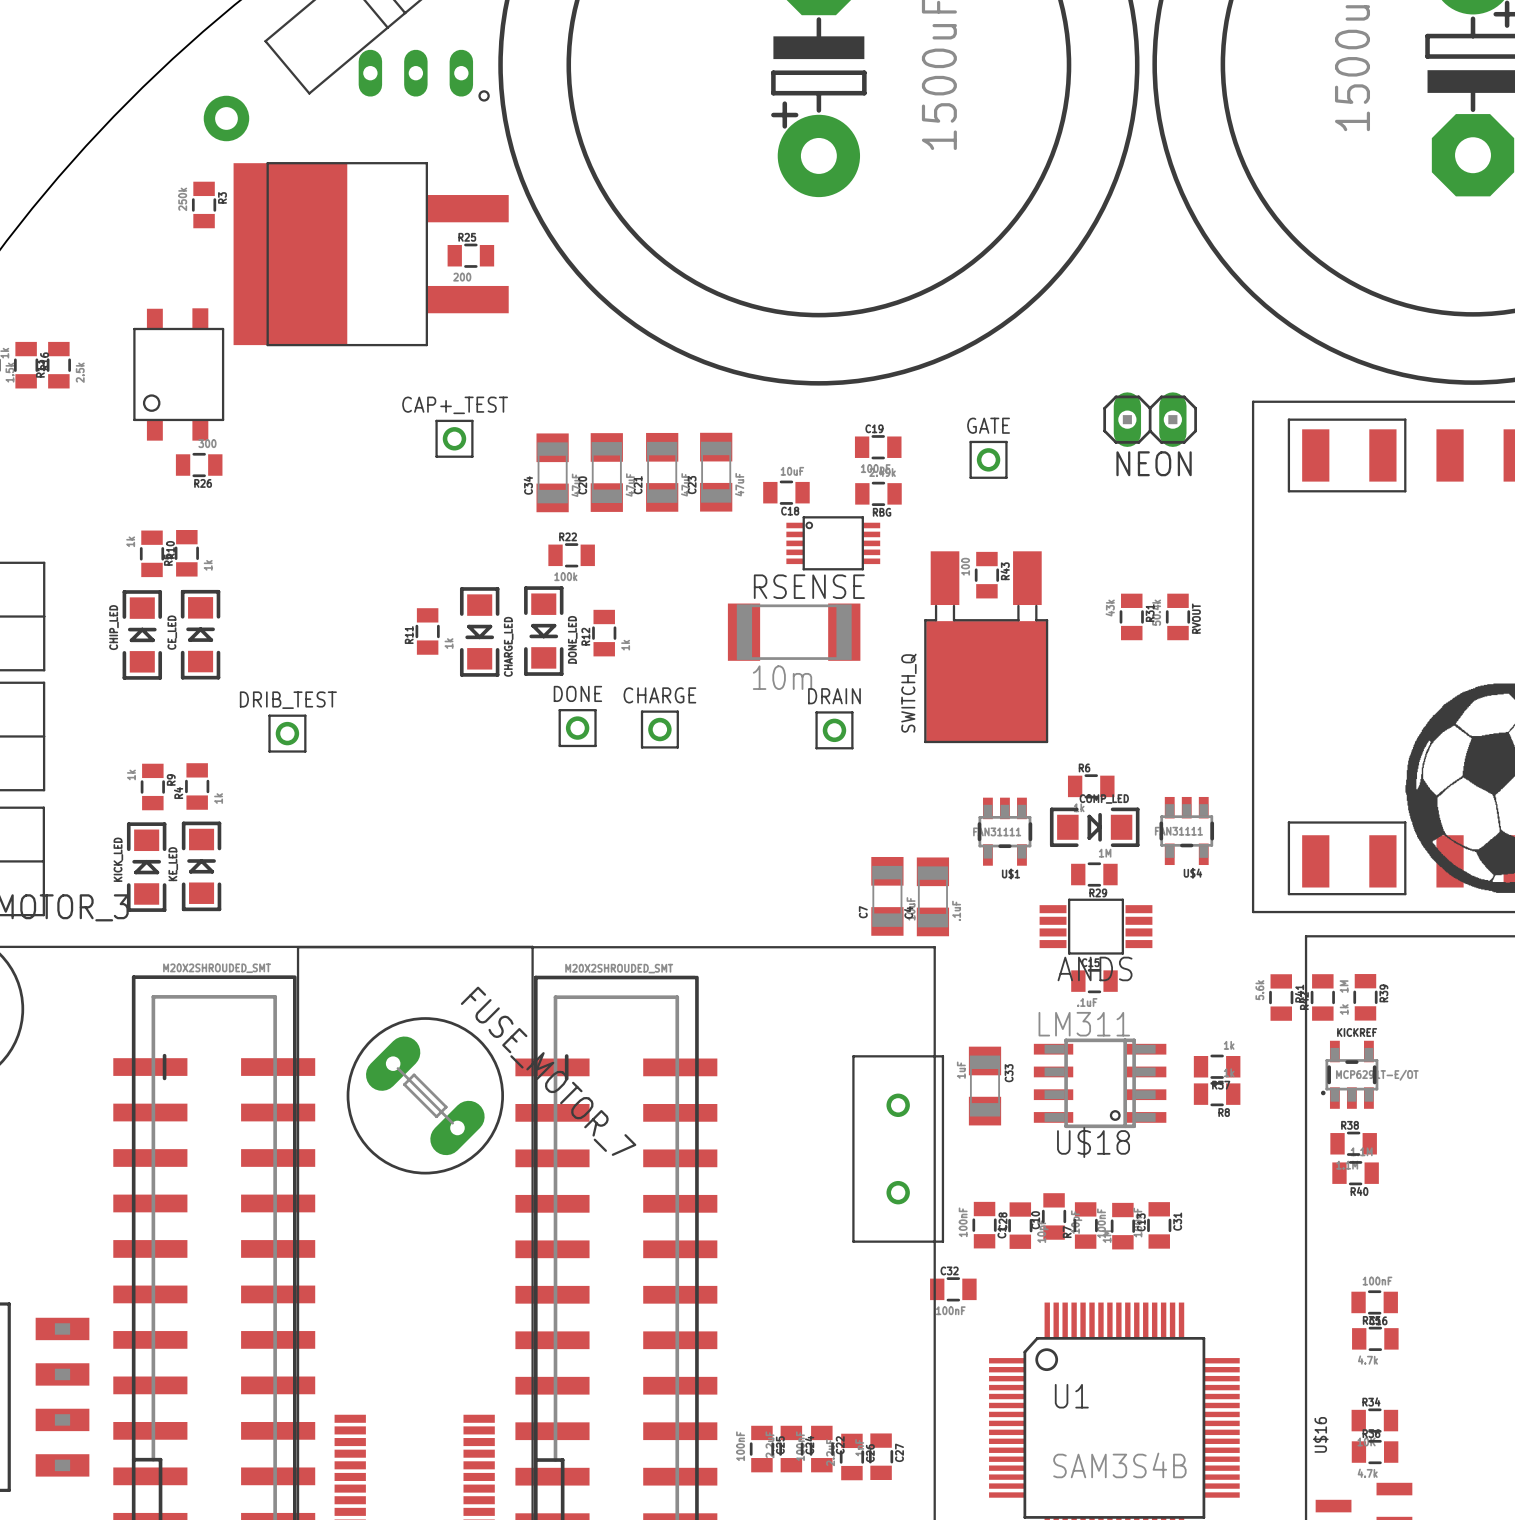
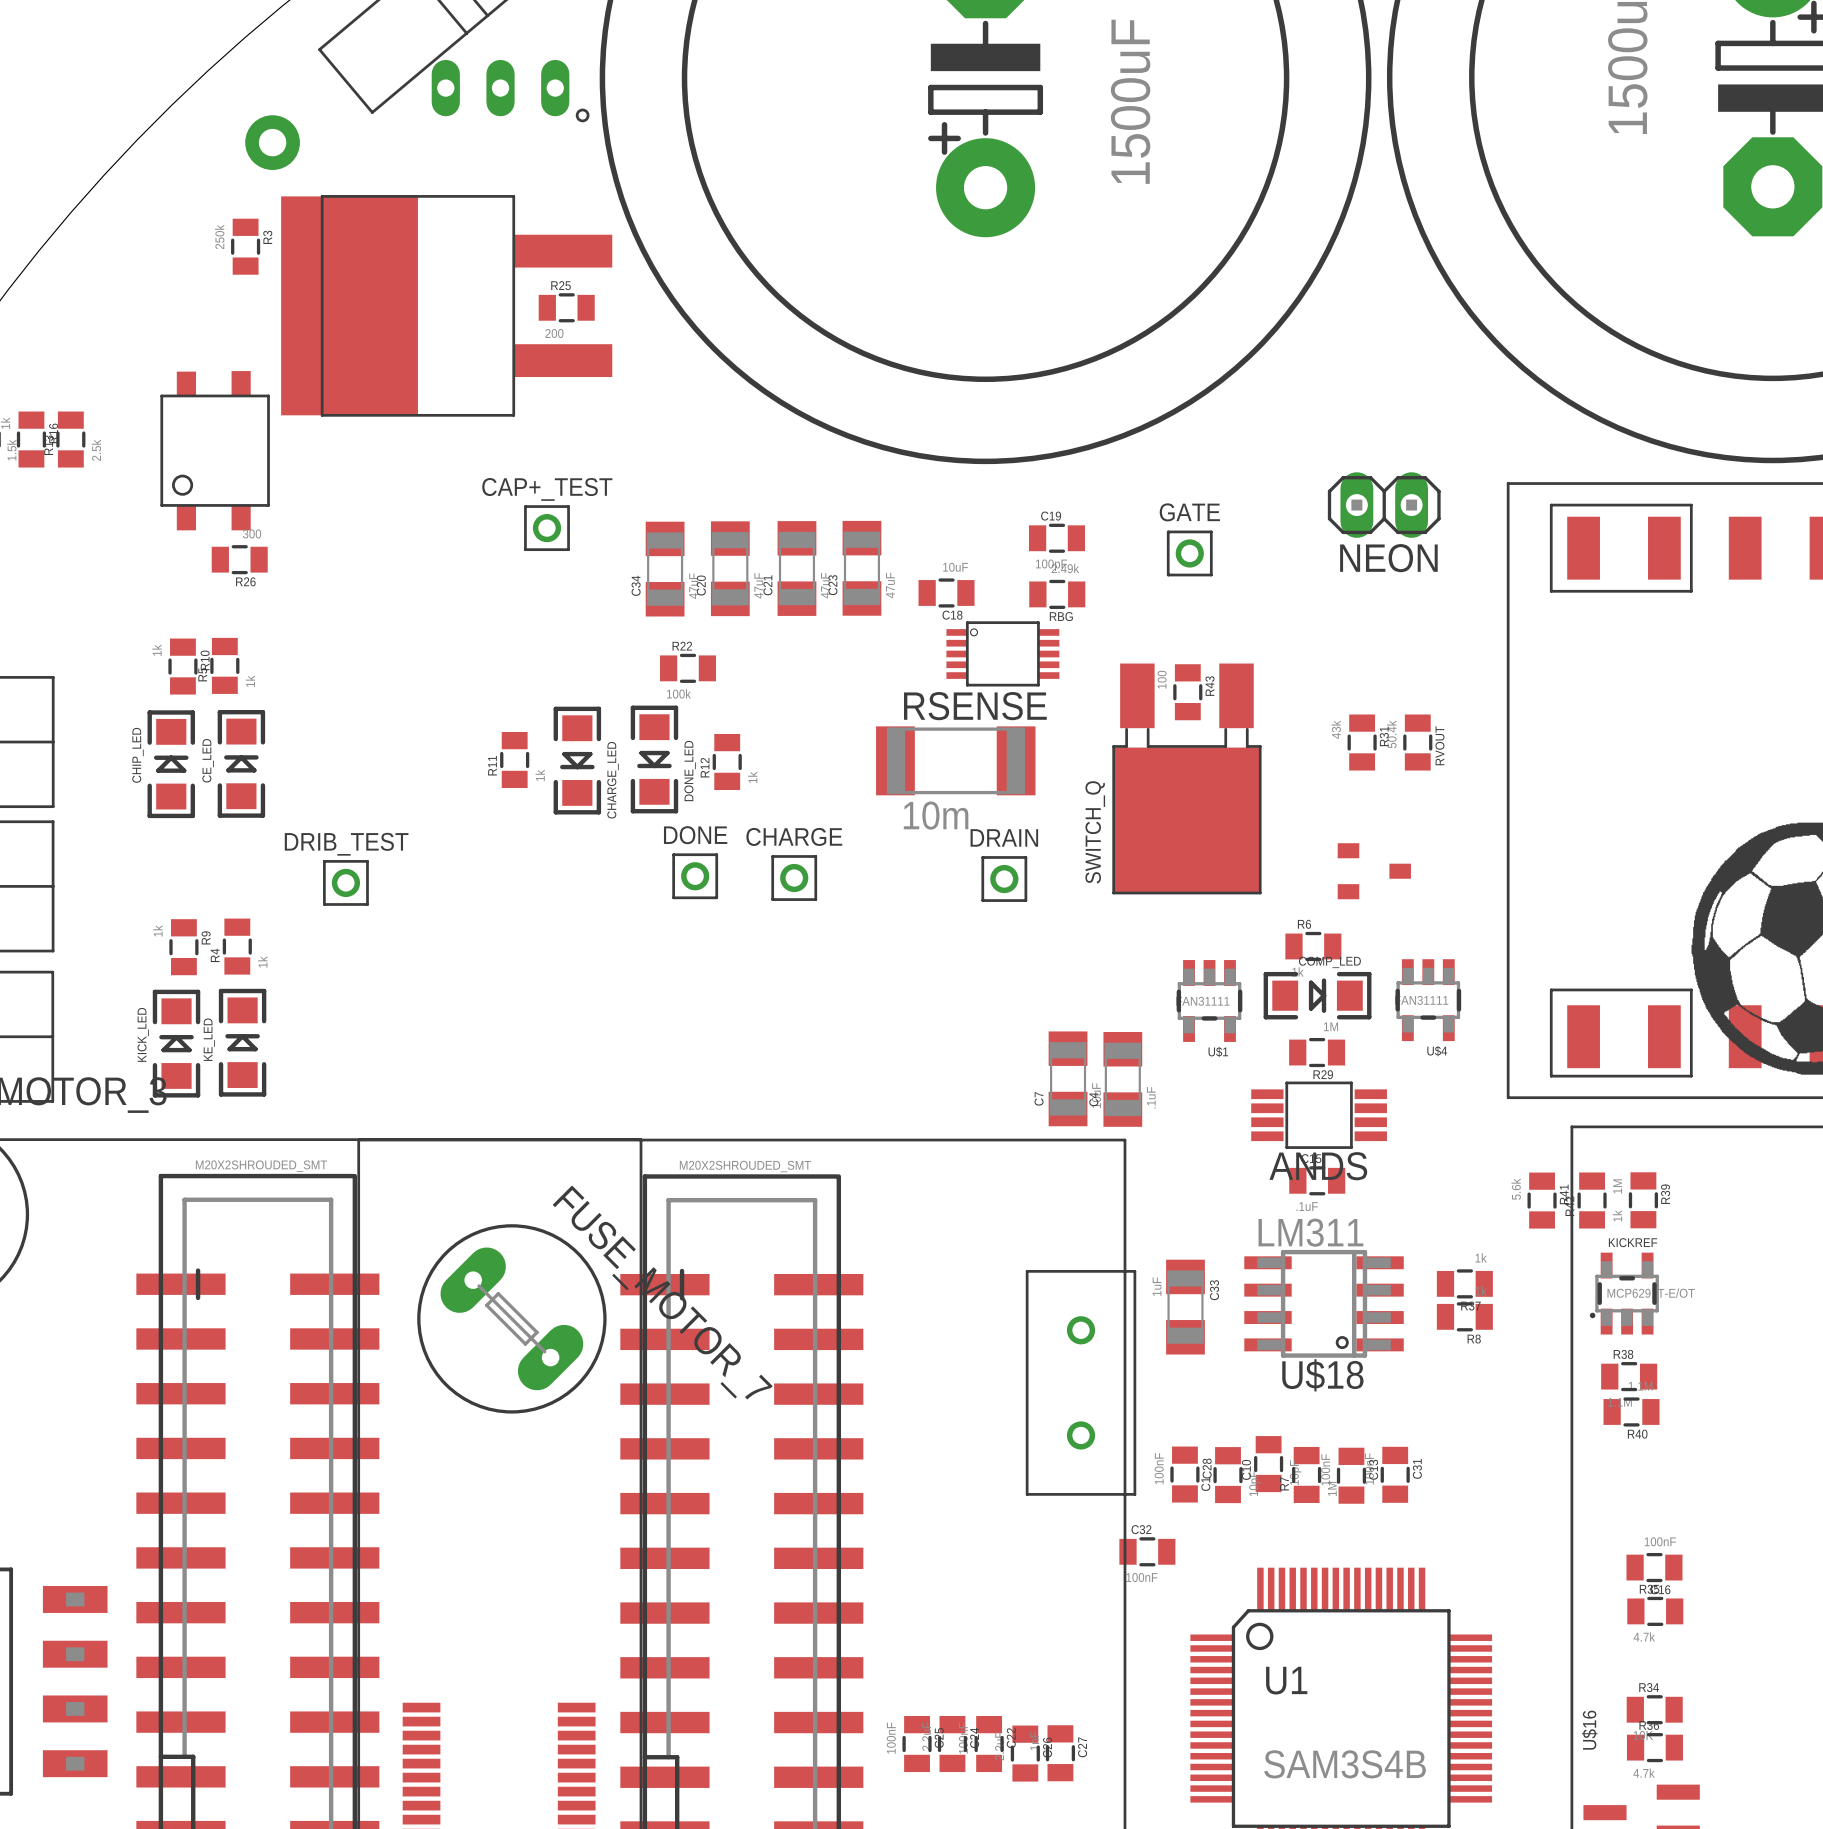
part: none -> (1374, 871)

